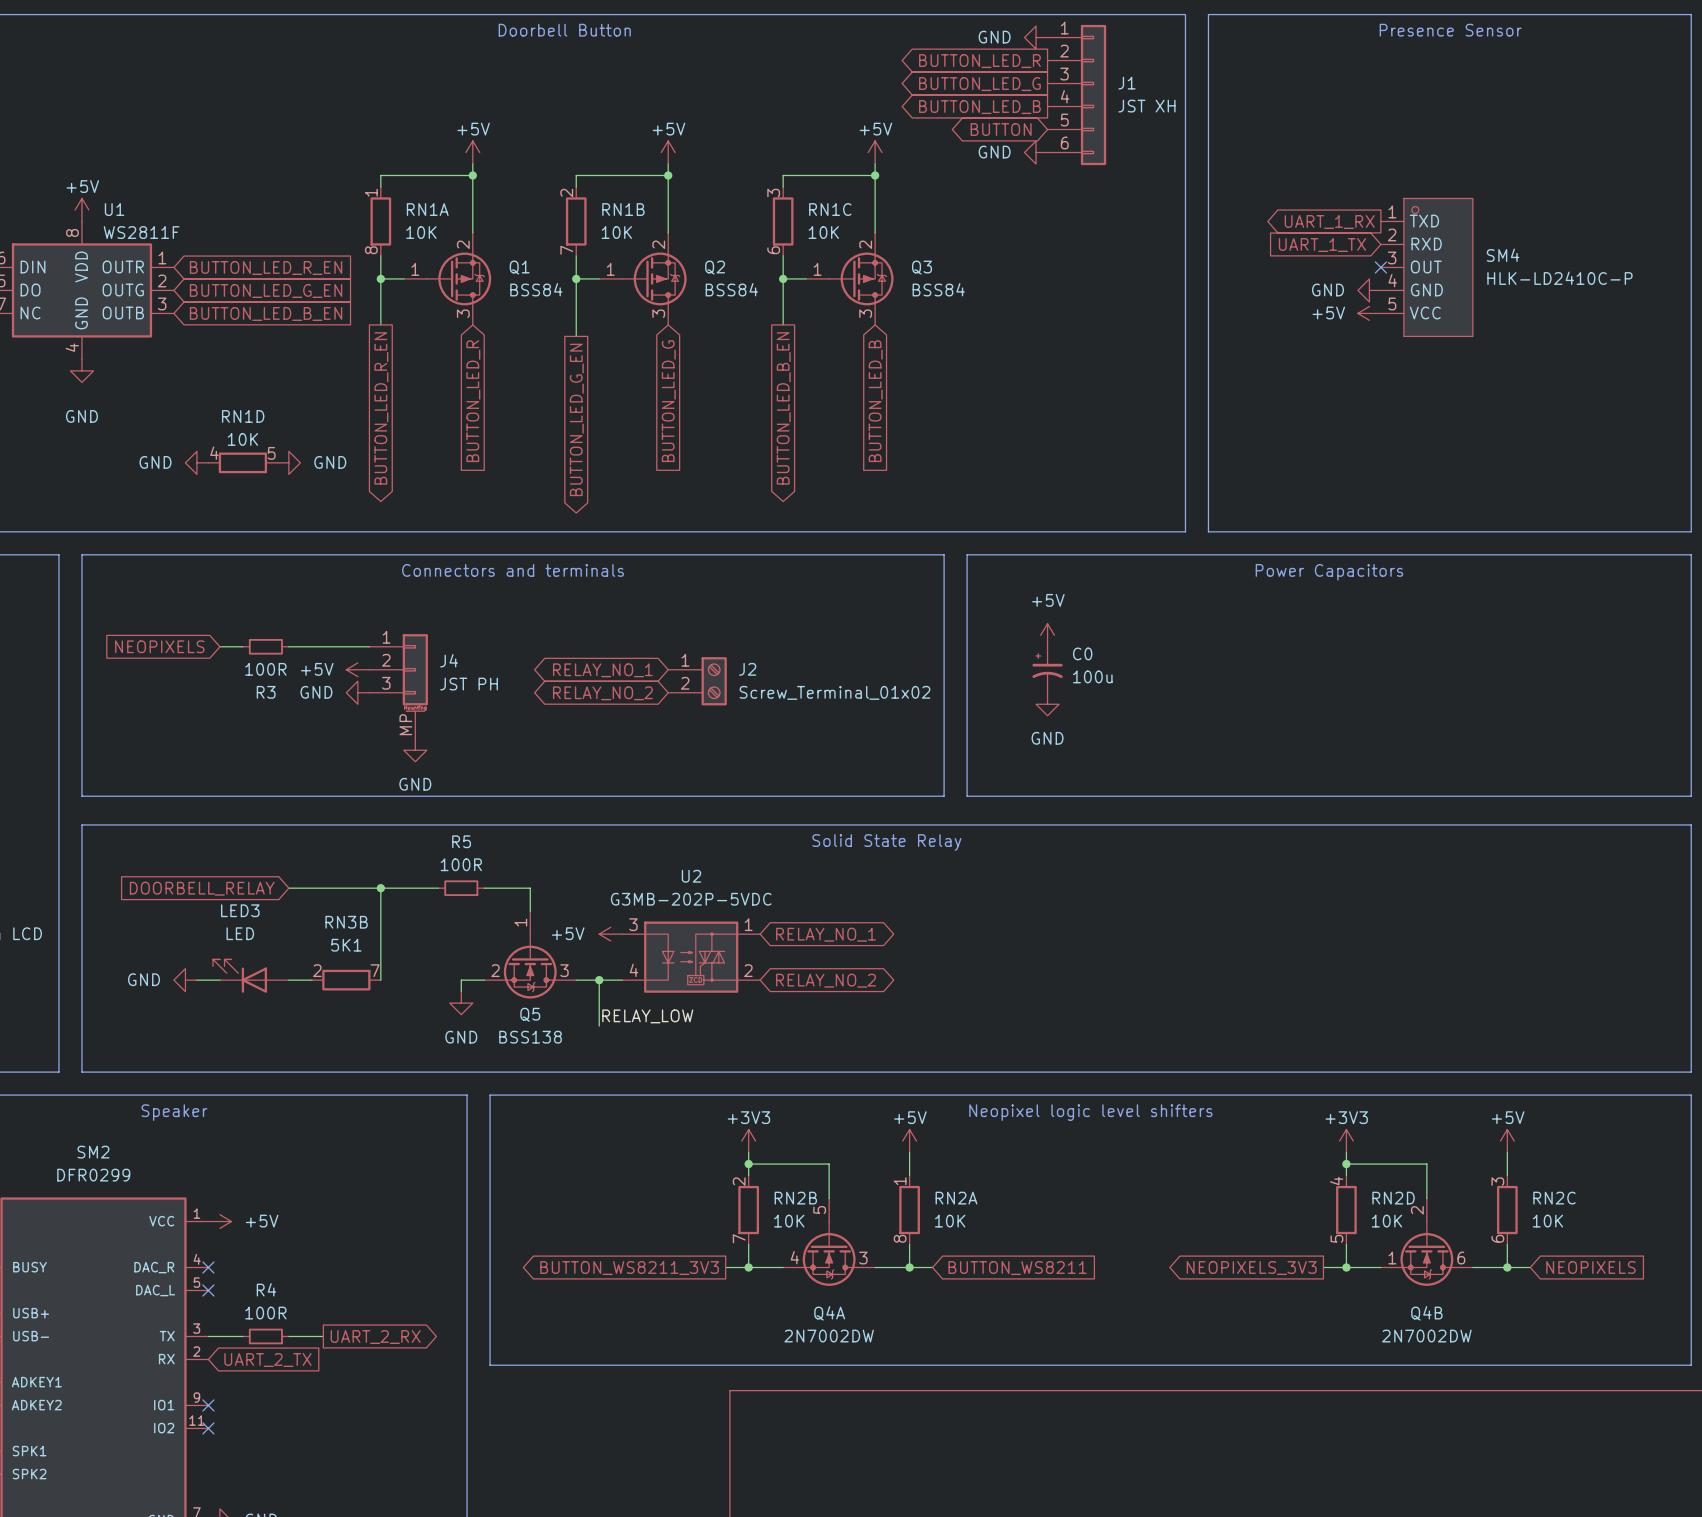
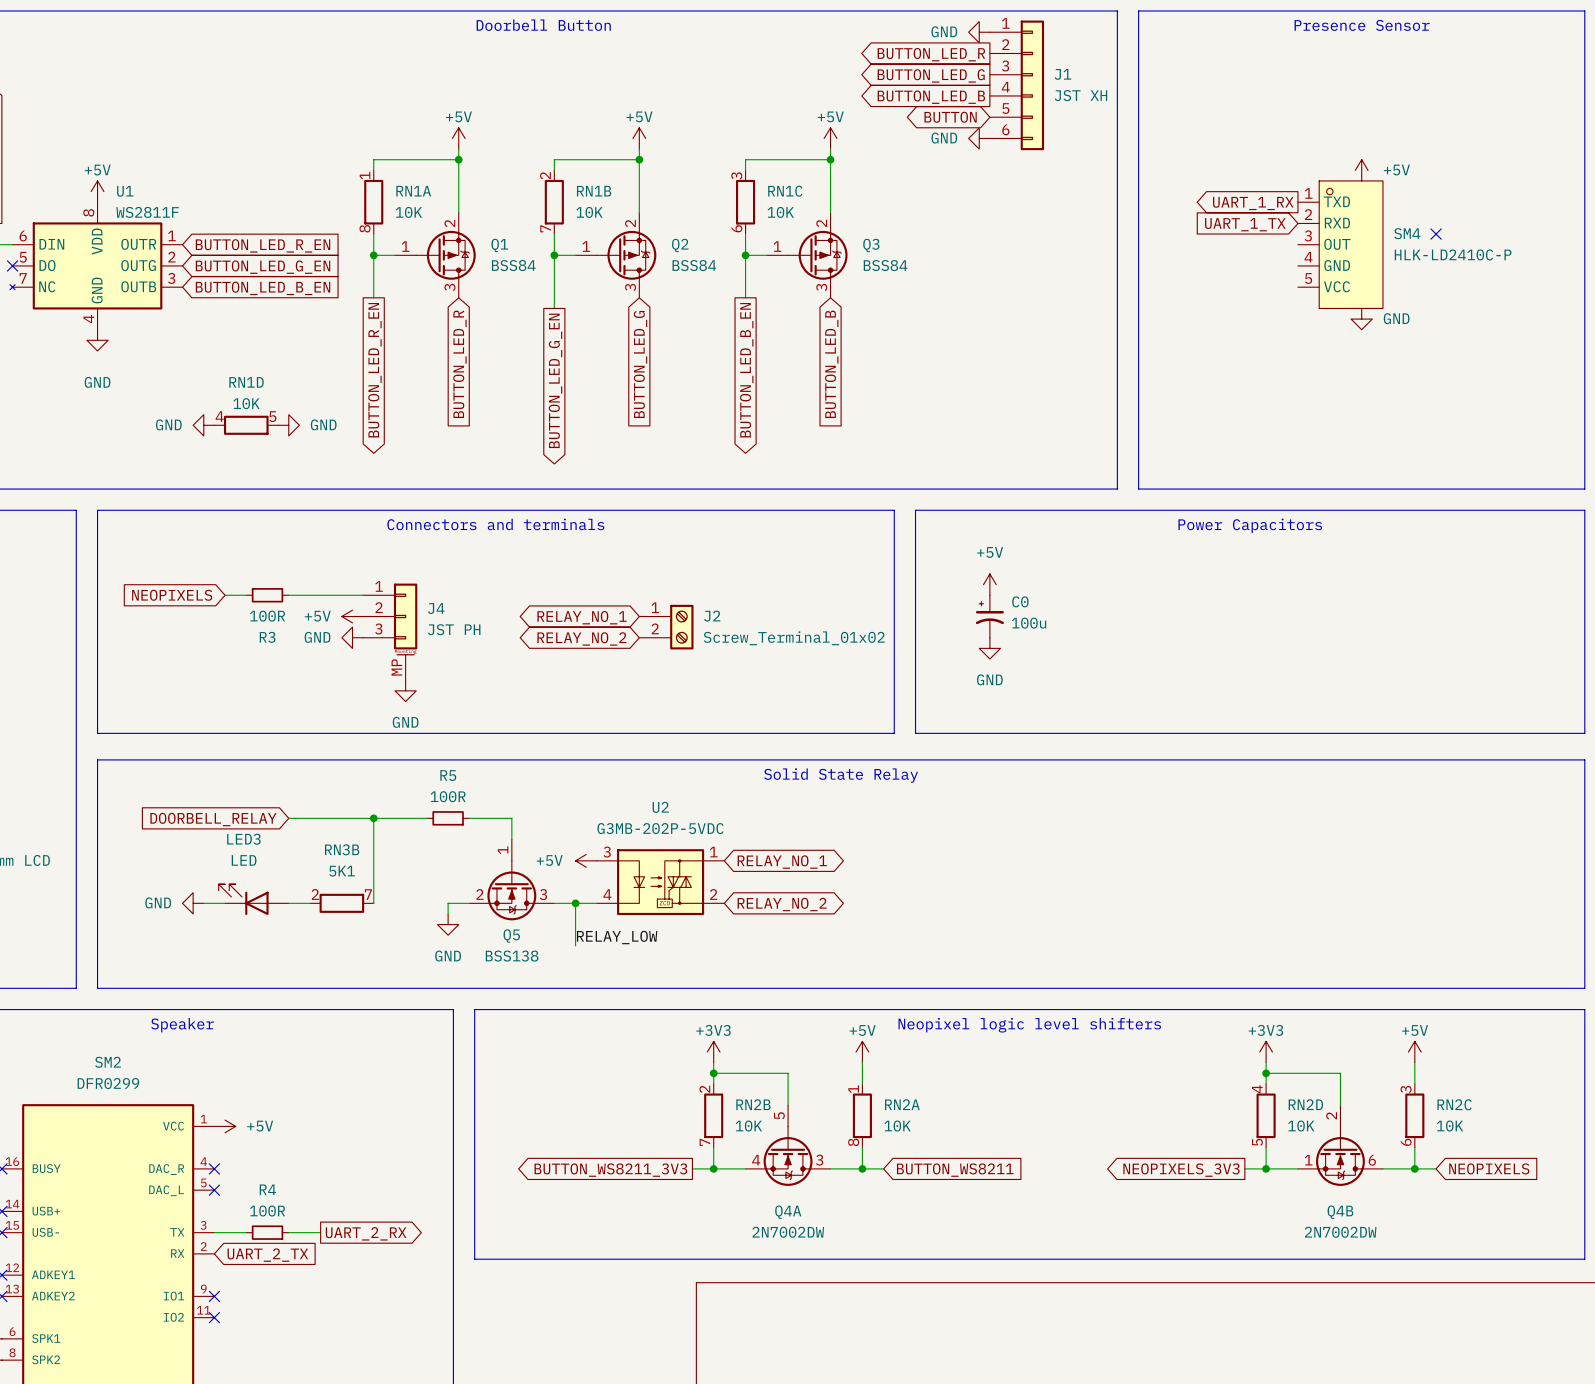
no-connect mark: none -> (1436, 234)
no-connect mark: (1380, 267) -> none
power symbol text position: GND (1327, 290) -> GND (1396, 318)
power symbol rotation: 0° (1369, 290) -> 90° counterclockwise (1361, 319)
power symbol position: GND (1369, 290) -> GND (1361, 319)
power symbol text position: +5V (1328, 313) -> +5V (1396, 170)
power symbol rotation: 0° (1369, 313) -> 90° clockwise (1361, 170)
power symbol position: +5V (1369, 313) -> +5V (1361, 170)

